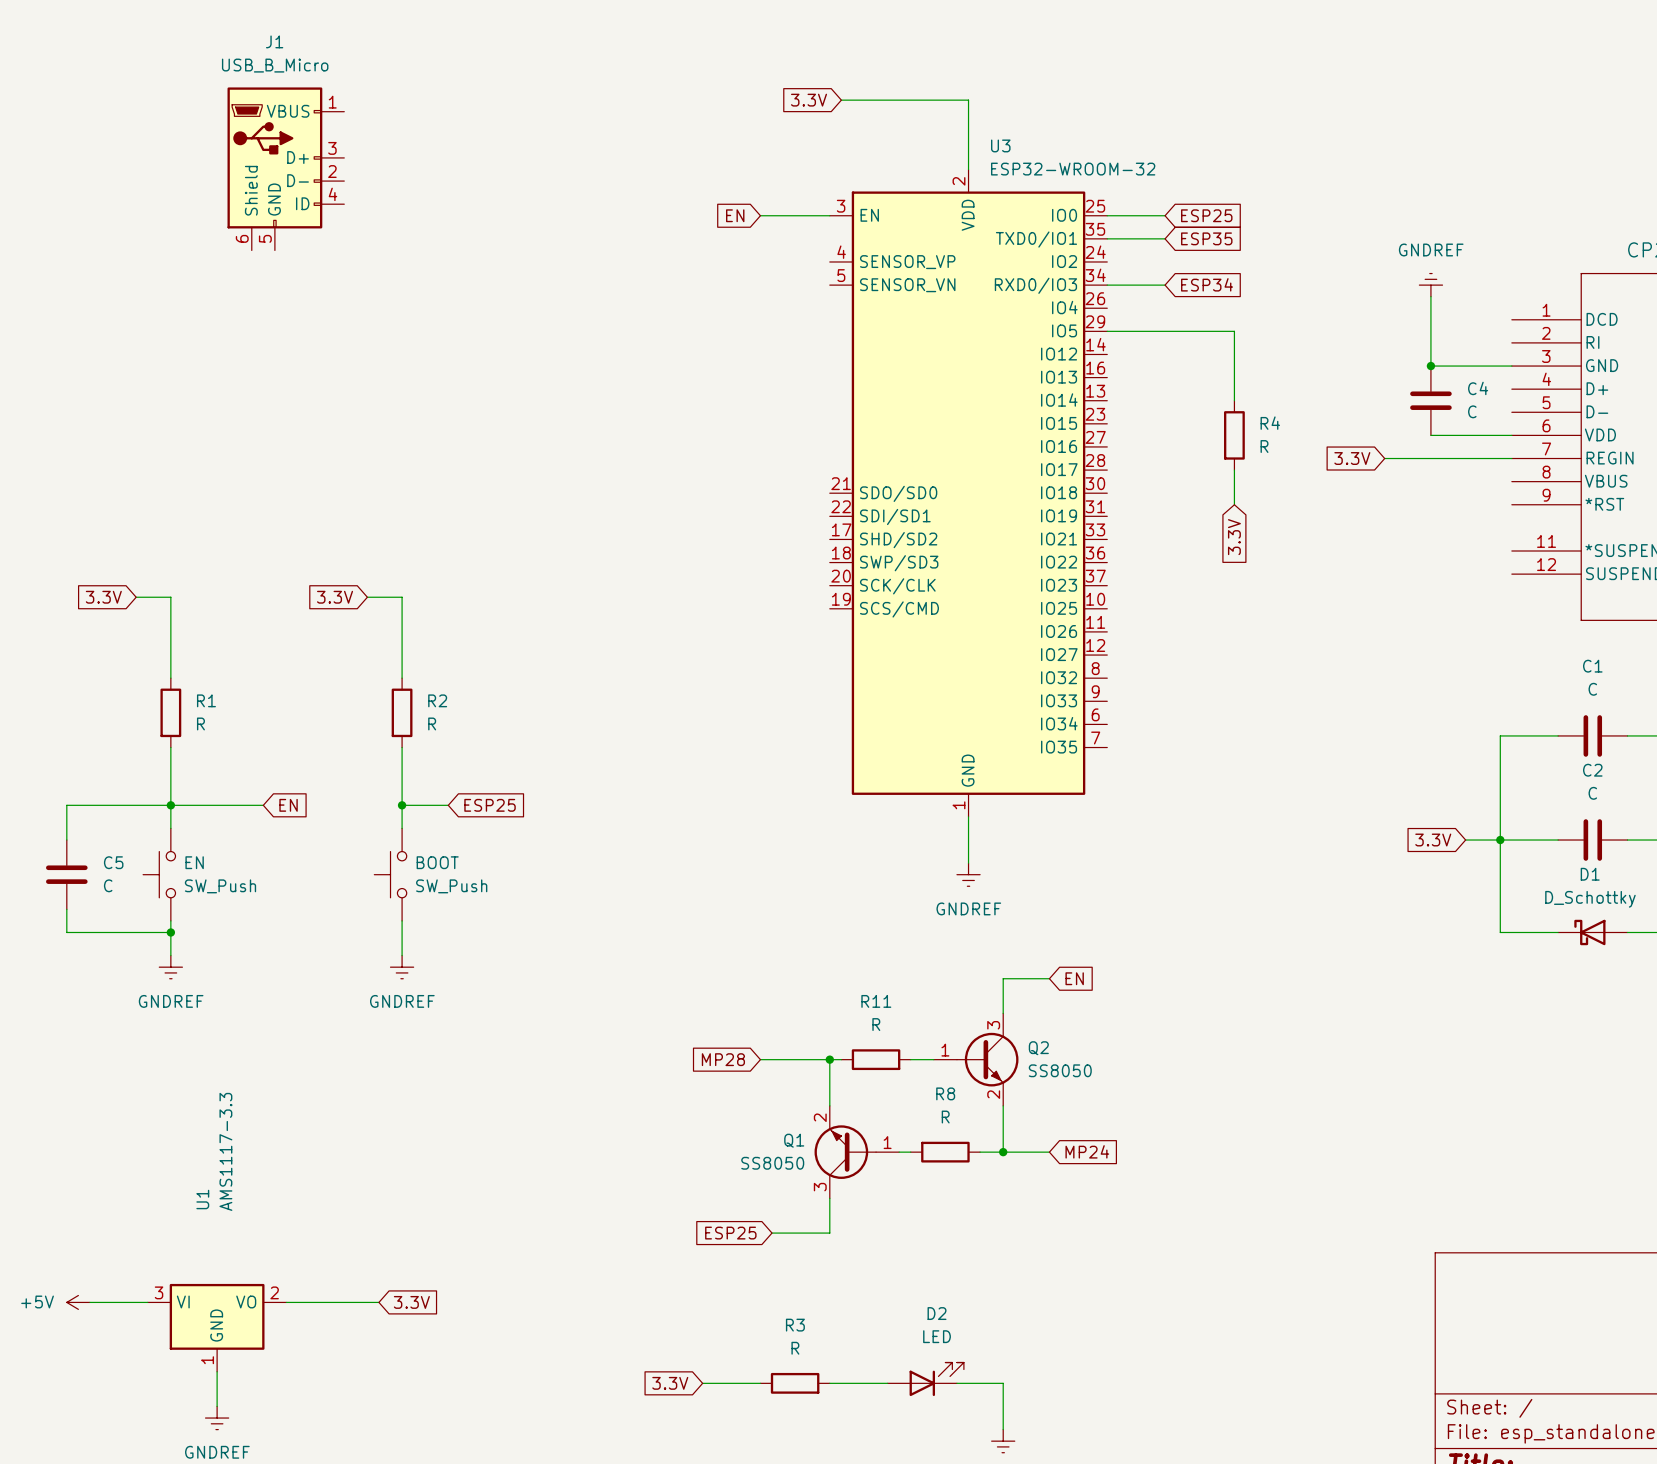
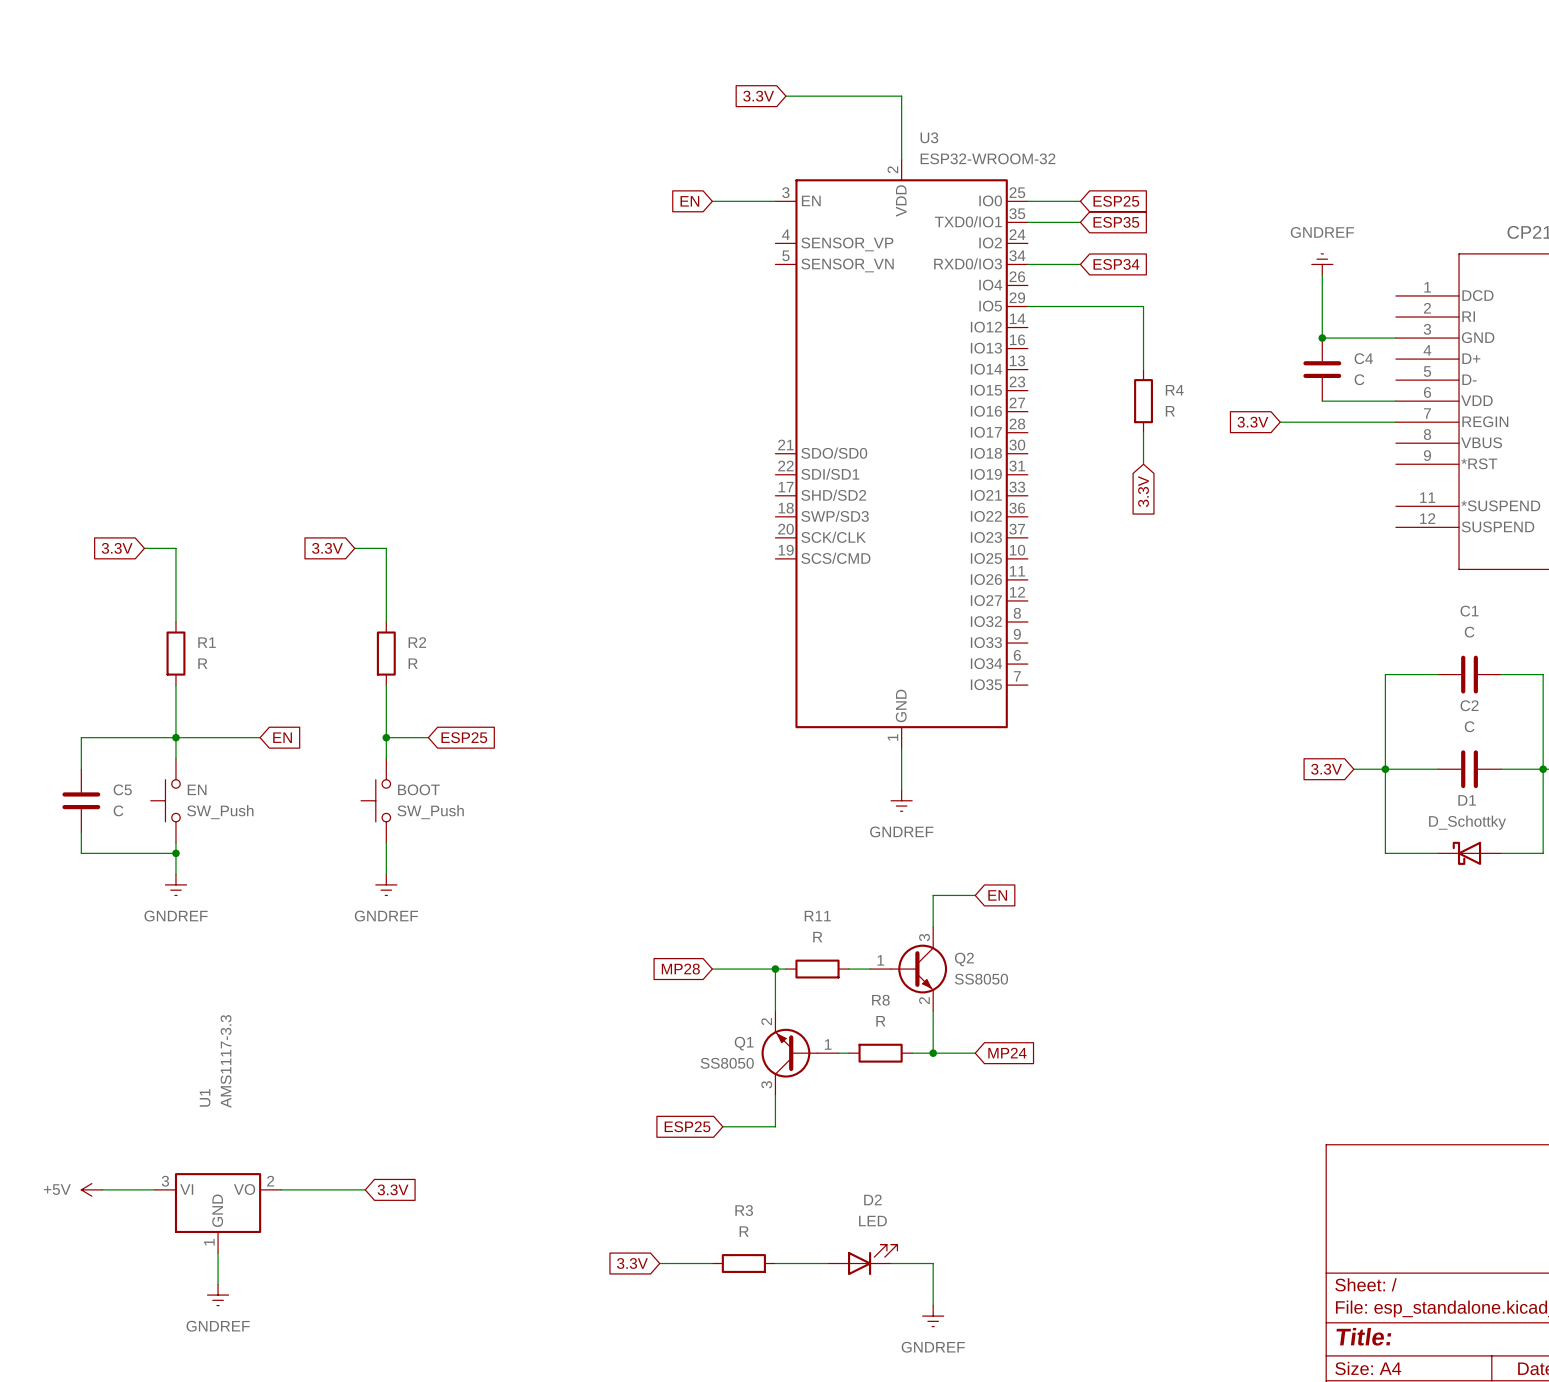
J1: USB_B_Micro (285, 168) -> none

